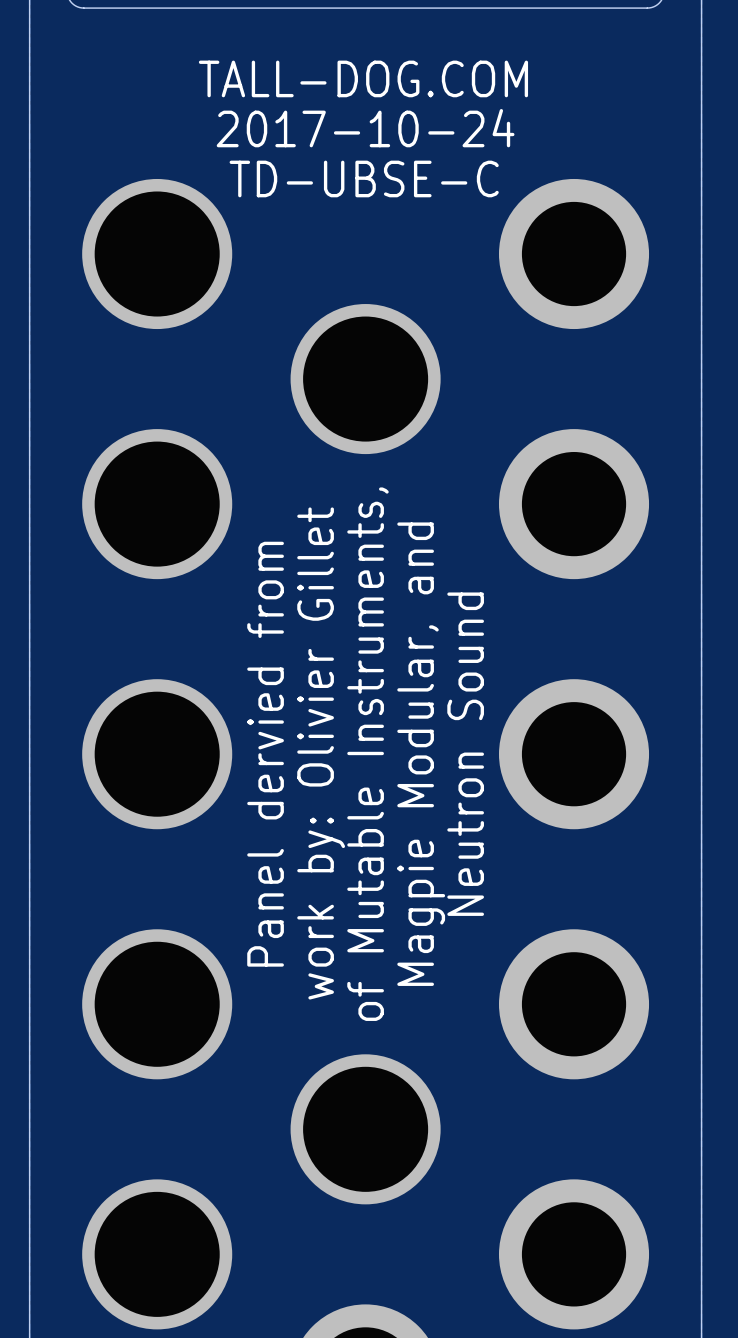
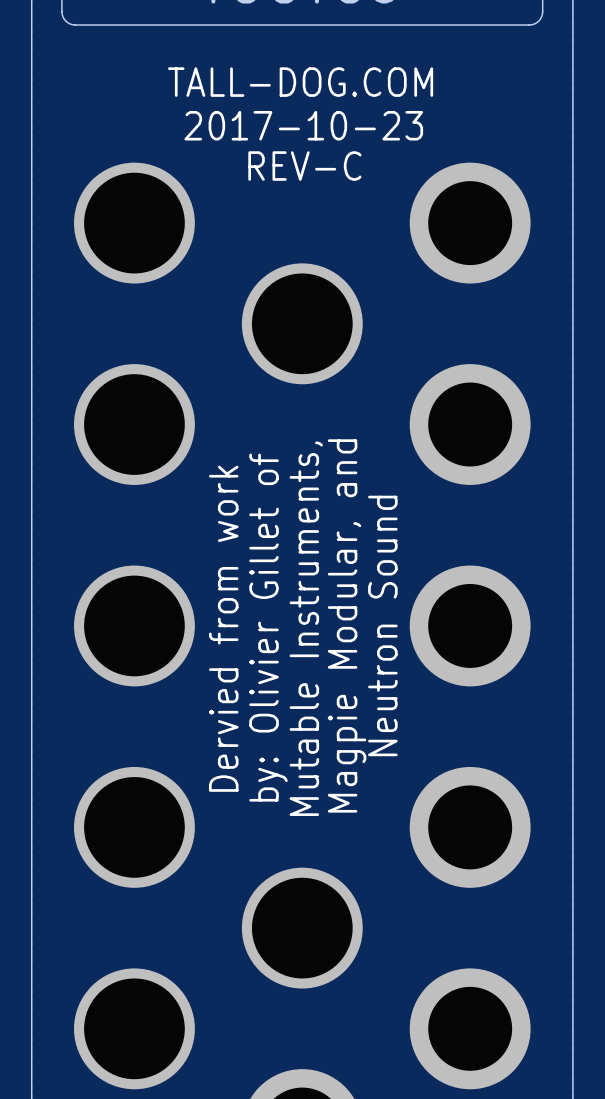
text: 2017-10-24 (365, 128) -> 2017-10-23 (303, 125)
text: TD-UBSE-C (364, 178) -> REV-C (304, 166)
text: work by: Olivier Gillet (321, 753) -> by: Olivier Gillet of (268, 627)
text: Panel dervied from (265, 754) -> Dervied from work (223, 628)
text: of Mutable Instruments, (367, 754) -> Mutable Instruments, (306, 628)

